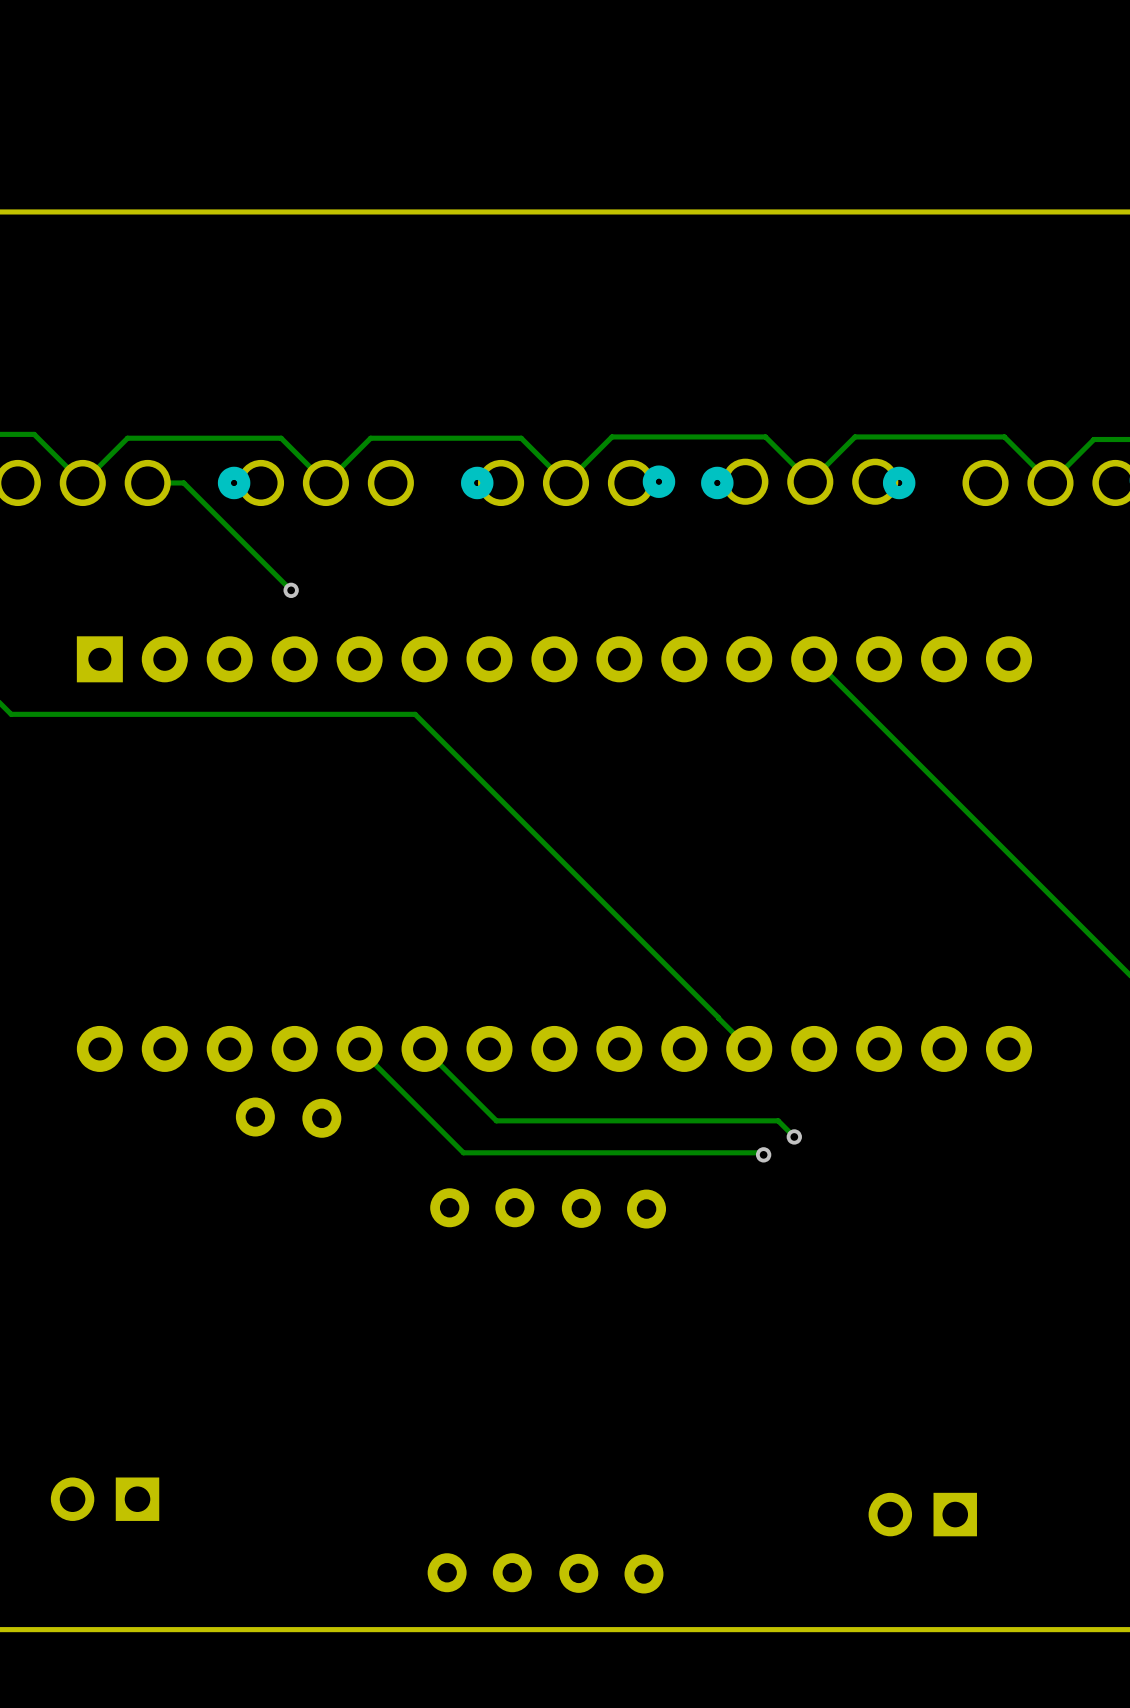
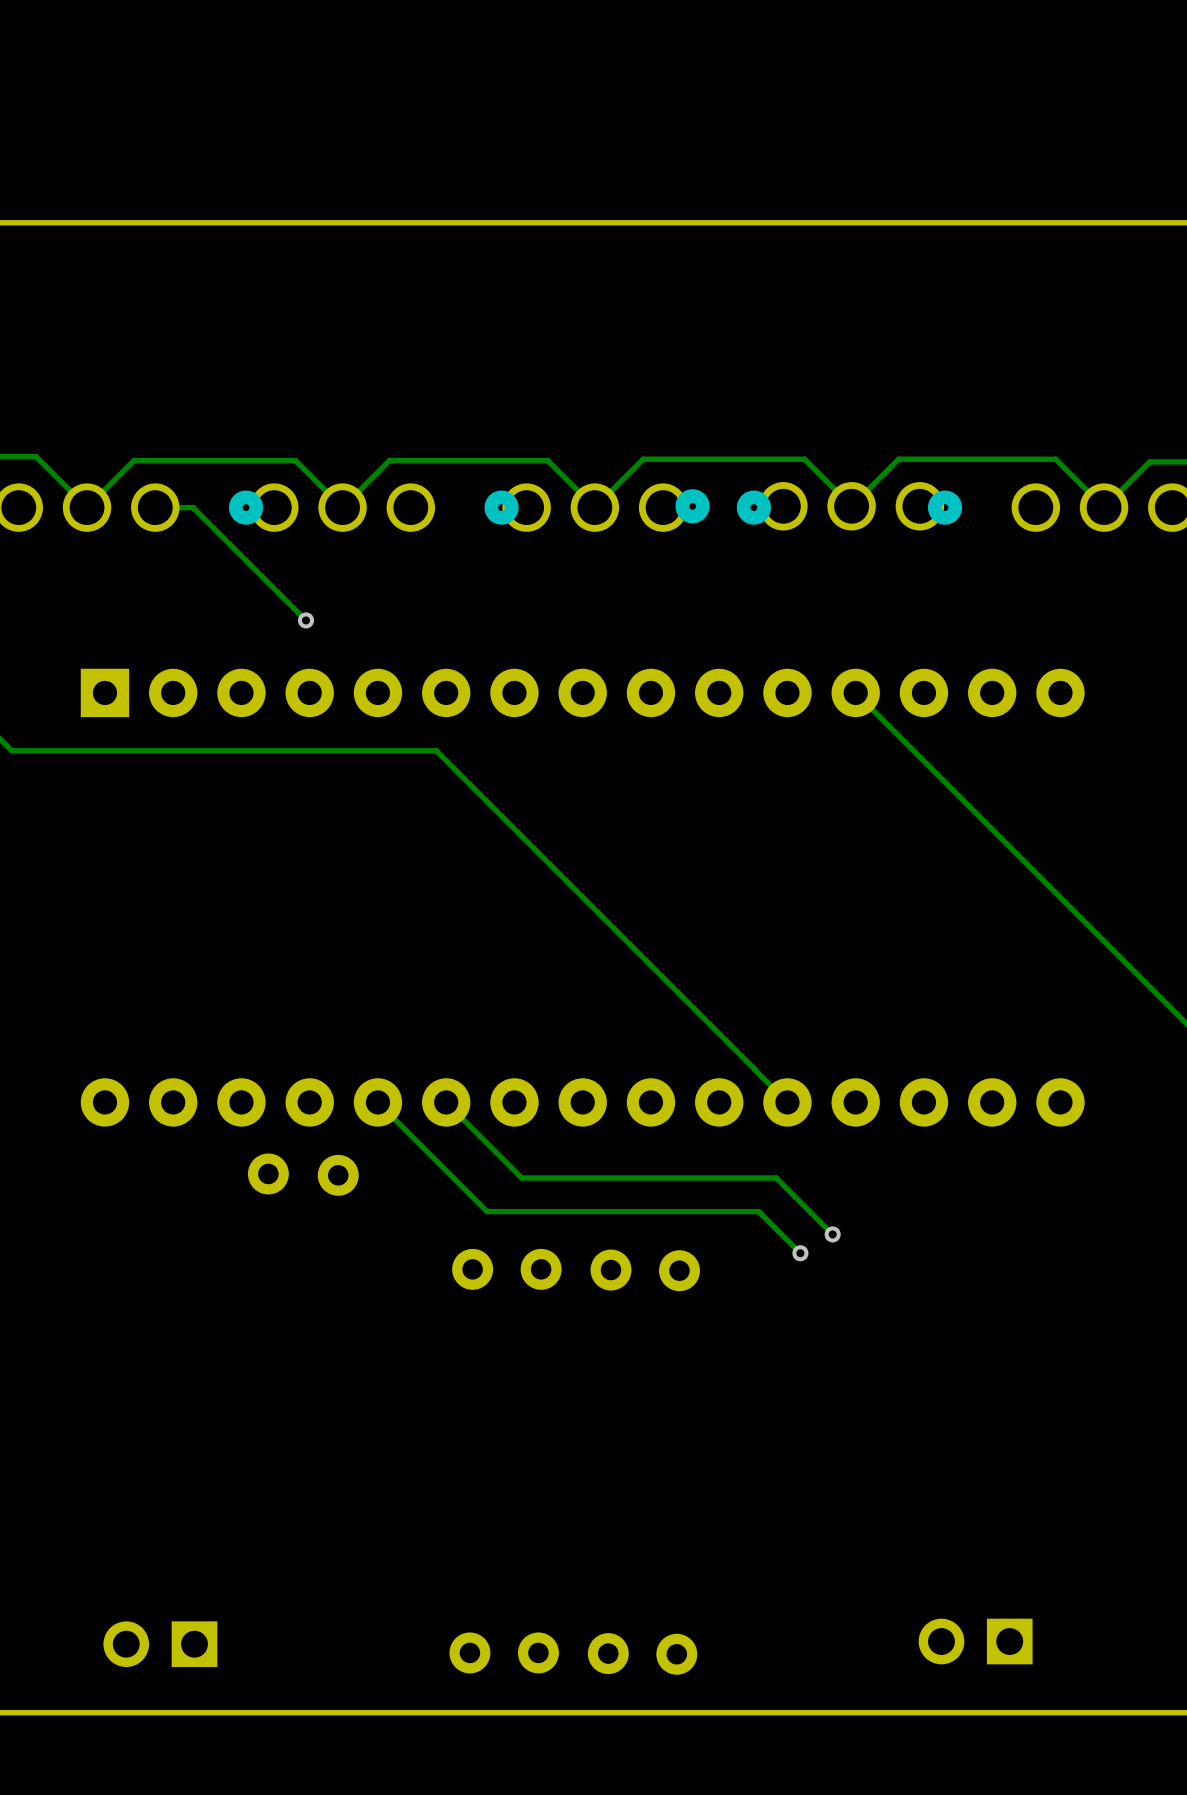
track: (738, 1120) (778, 1120) (794, 1136) -> (776, 1178) (832, 1234)
via: (794, 1136) -> none
track: (721, 1152) (761, 1152) (763, 1154) -> (758, 1211) (800, 1253)
via: (763, 1154) -> none
via: none -> (832, 1234)
via: none -> (800, 1253)
part position: (105, 1499) -> (160, 1644)
part position: (922, 1514) -> (975, 1641)

